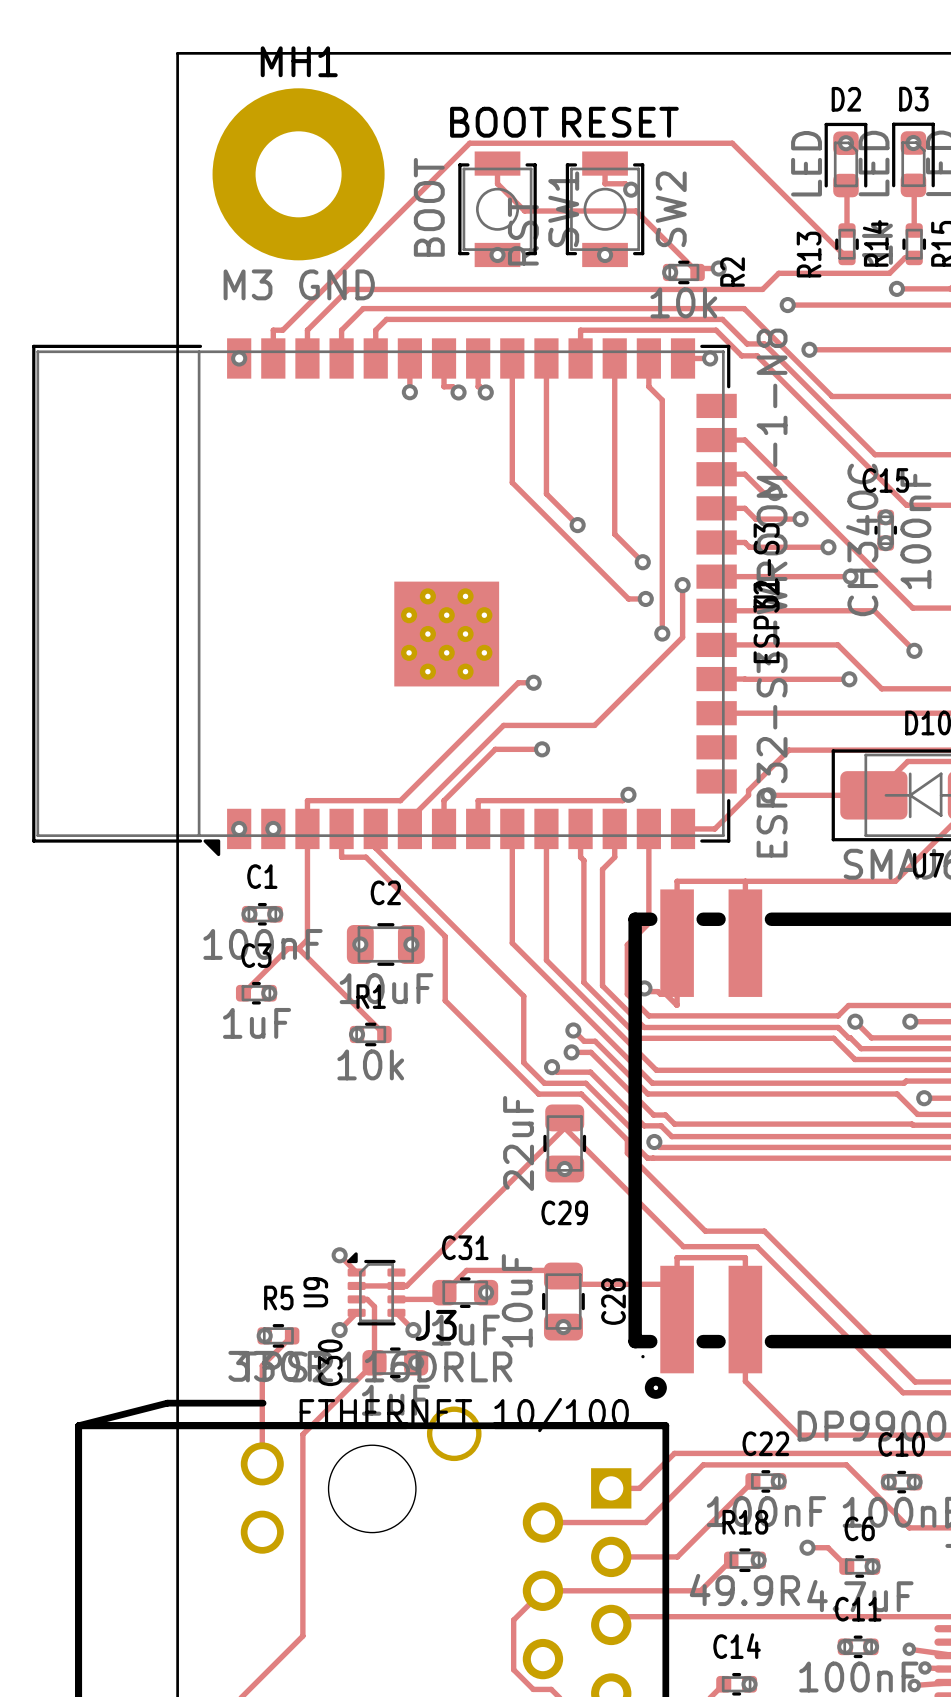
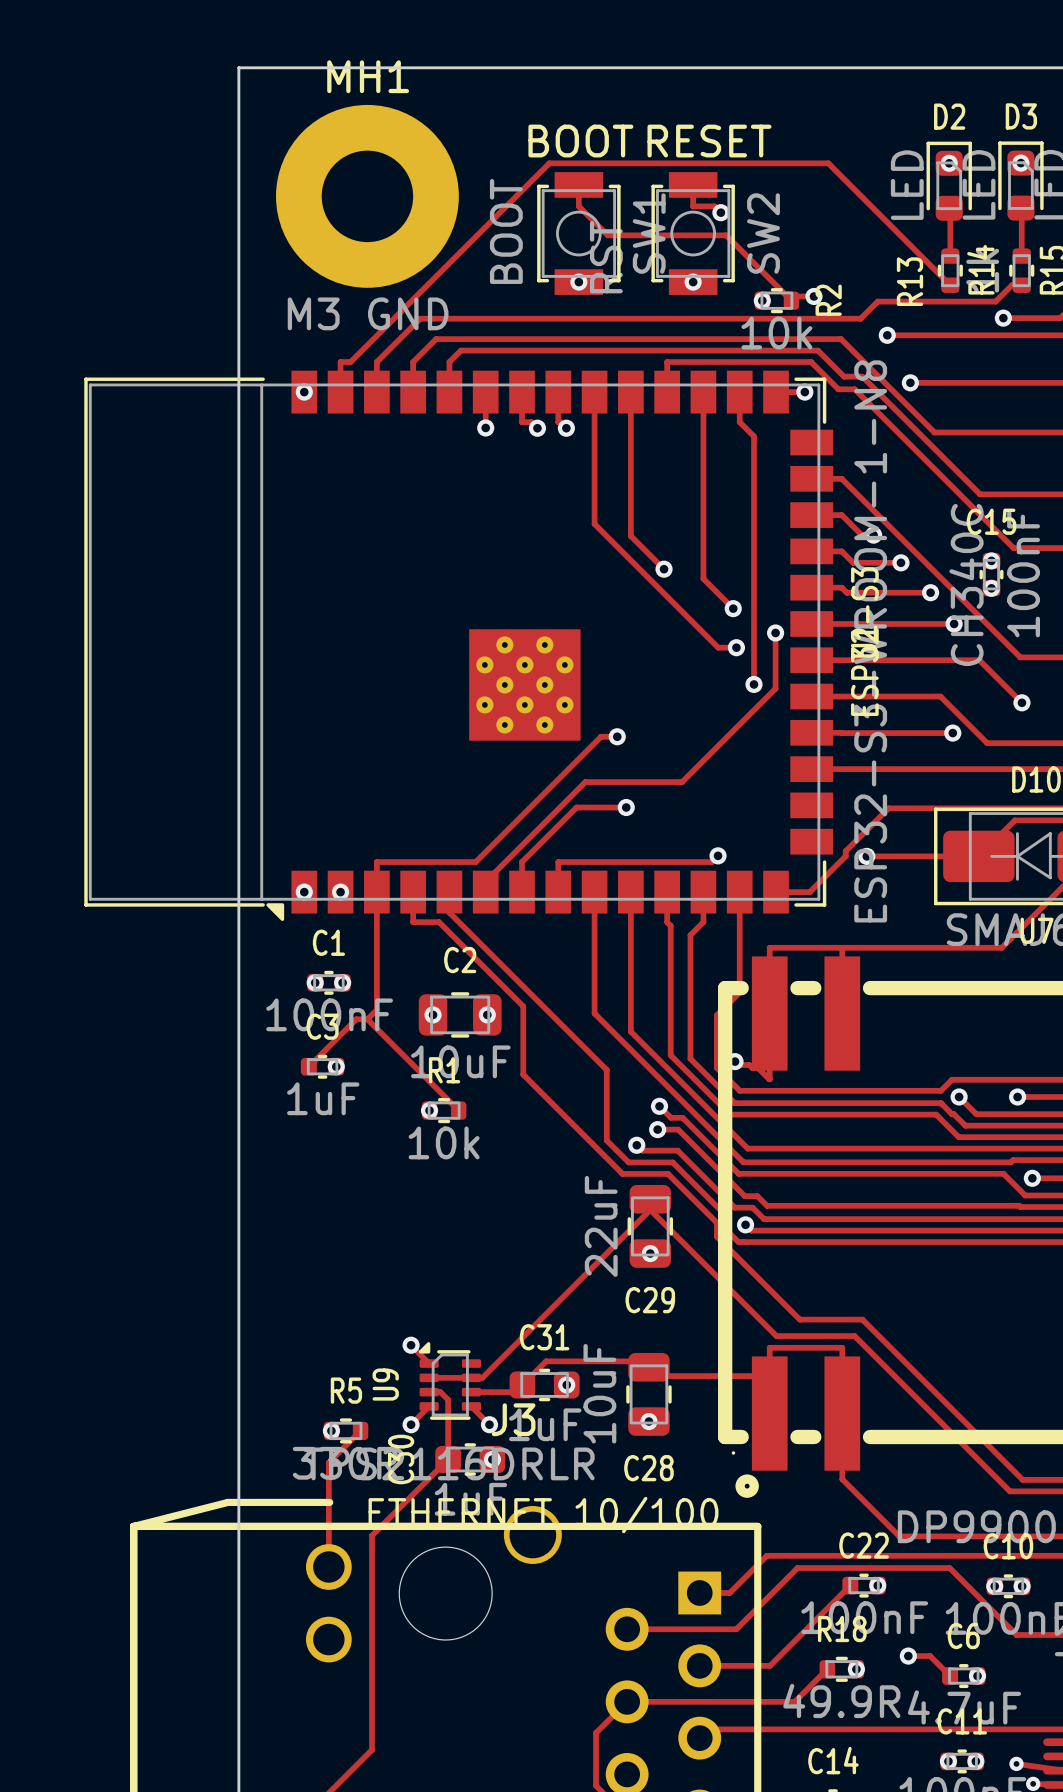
C28 name rotation: 0° (613, 1301) -> 90° clockwise (648, 1468)
C28 name position: C28 (613, 1301) -> C28 (648, 1468)

